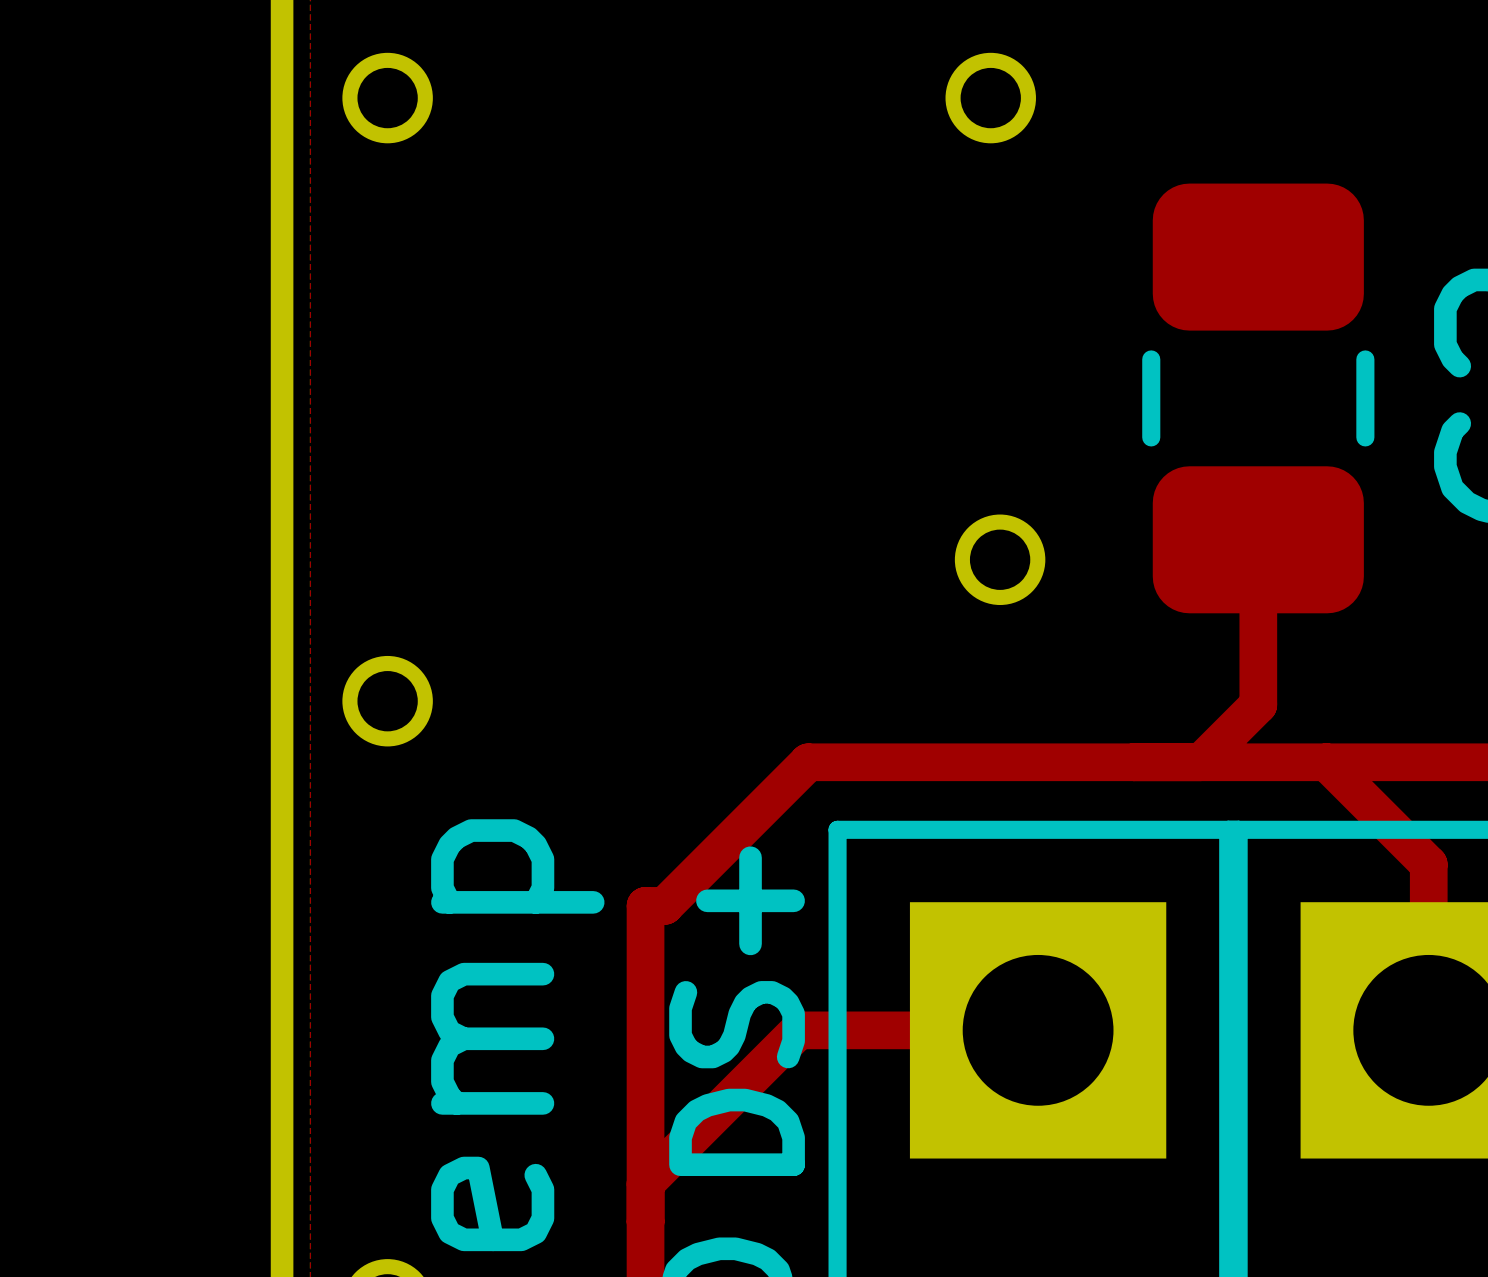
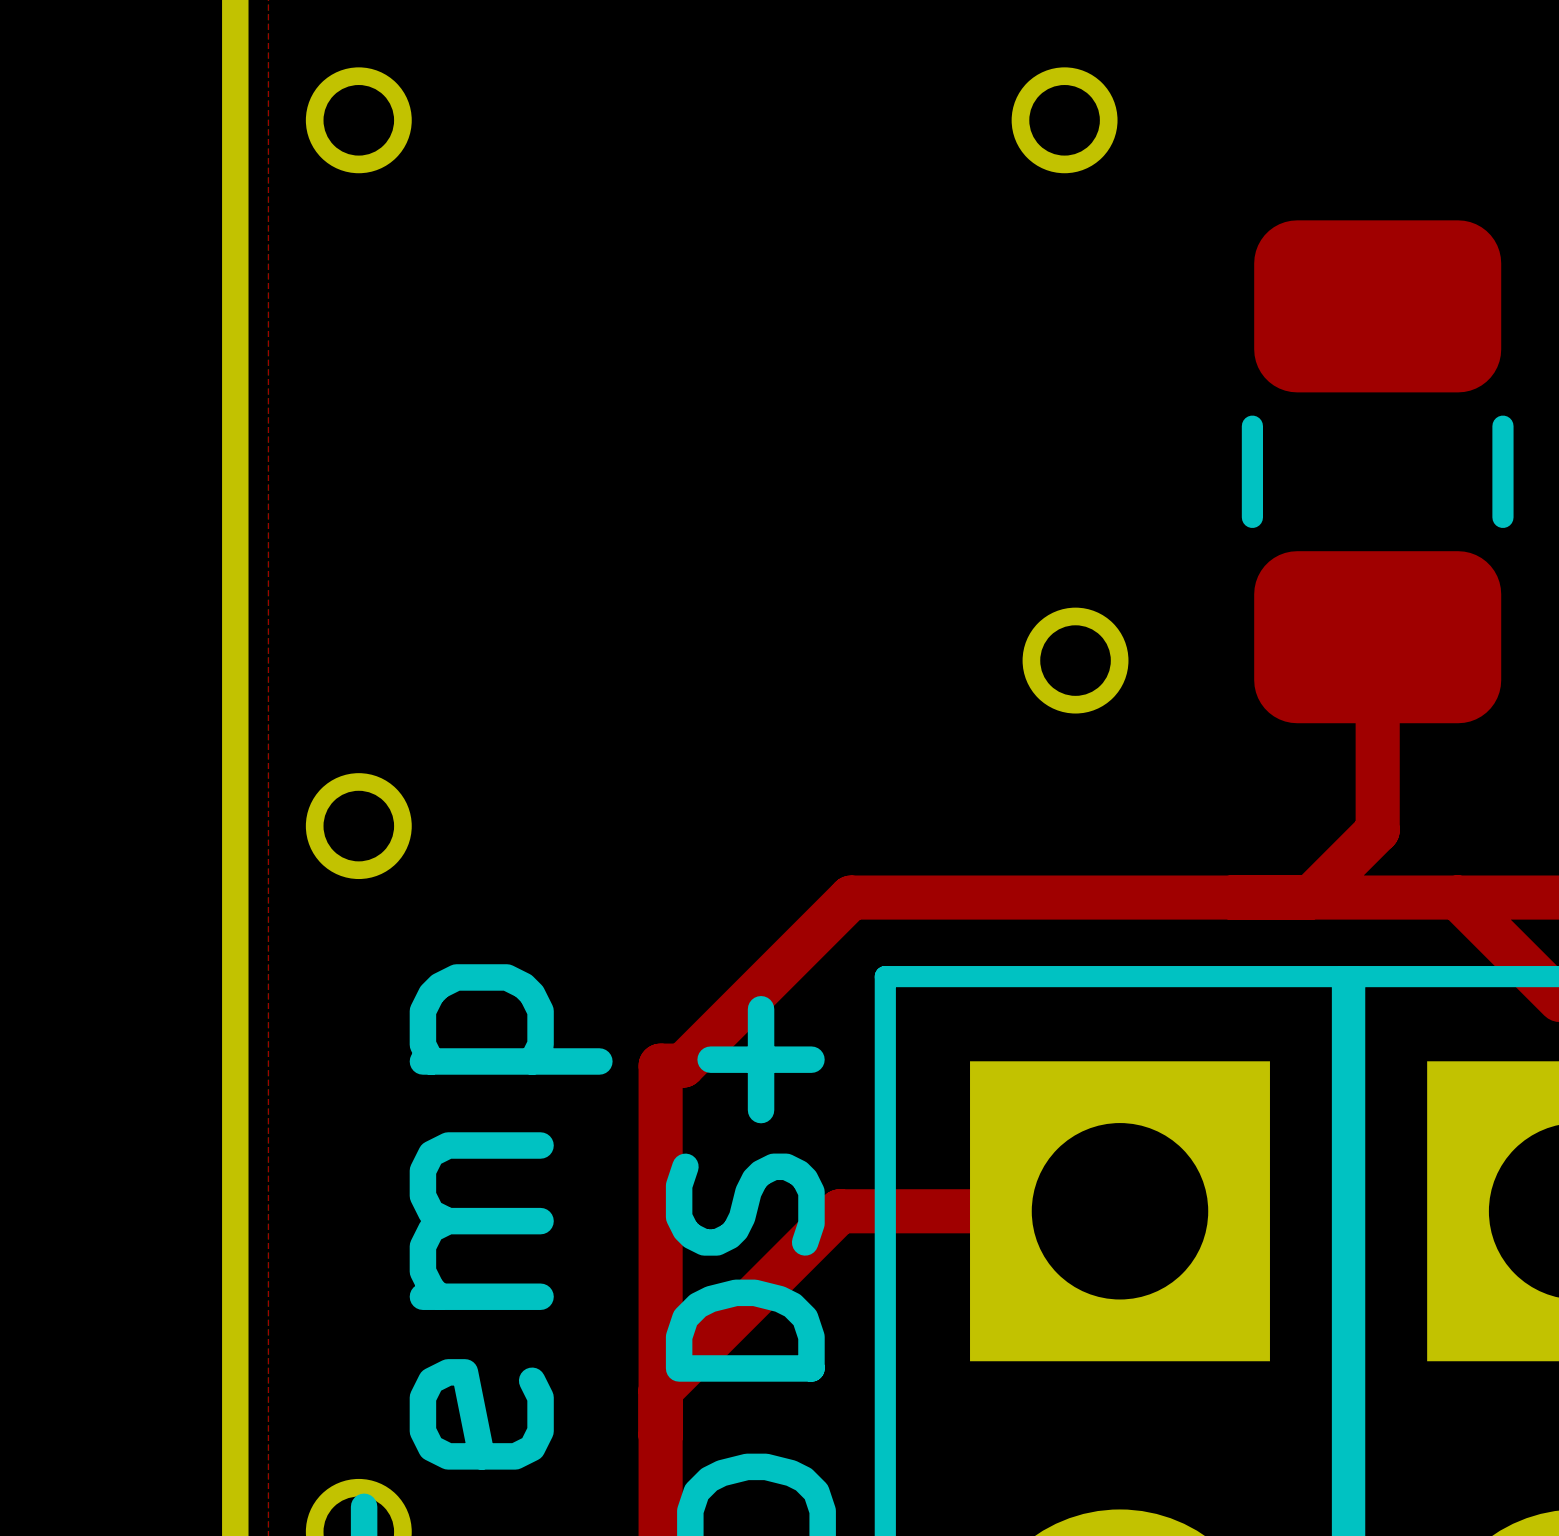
text position: DS+ (737, 1011) -> DS+ (745, 1188)

